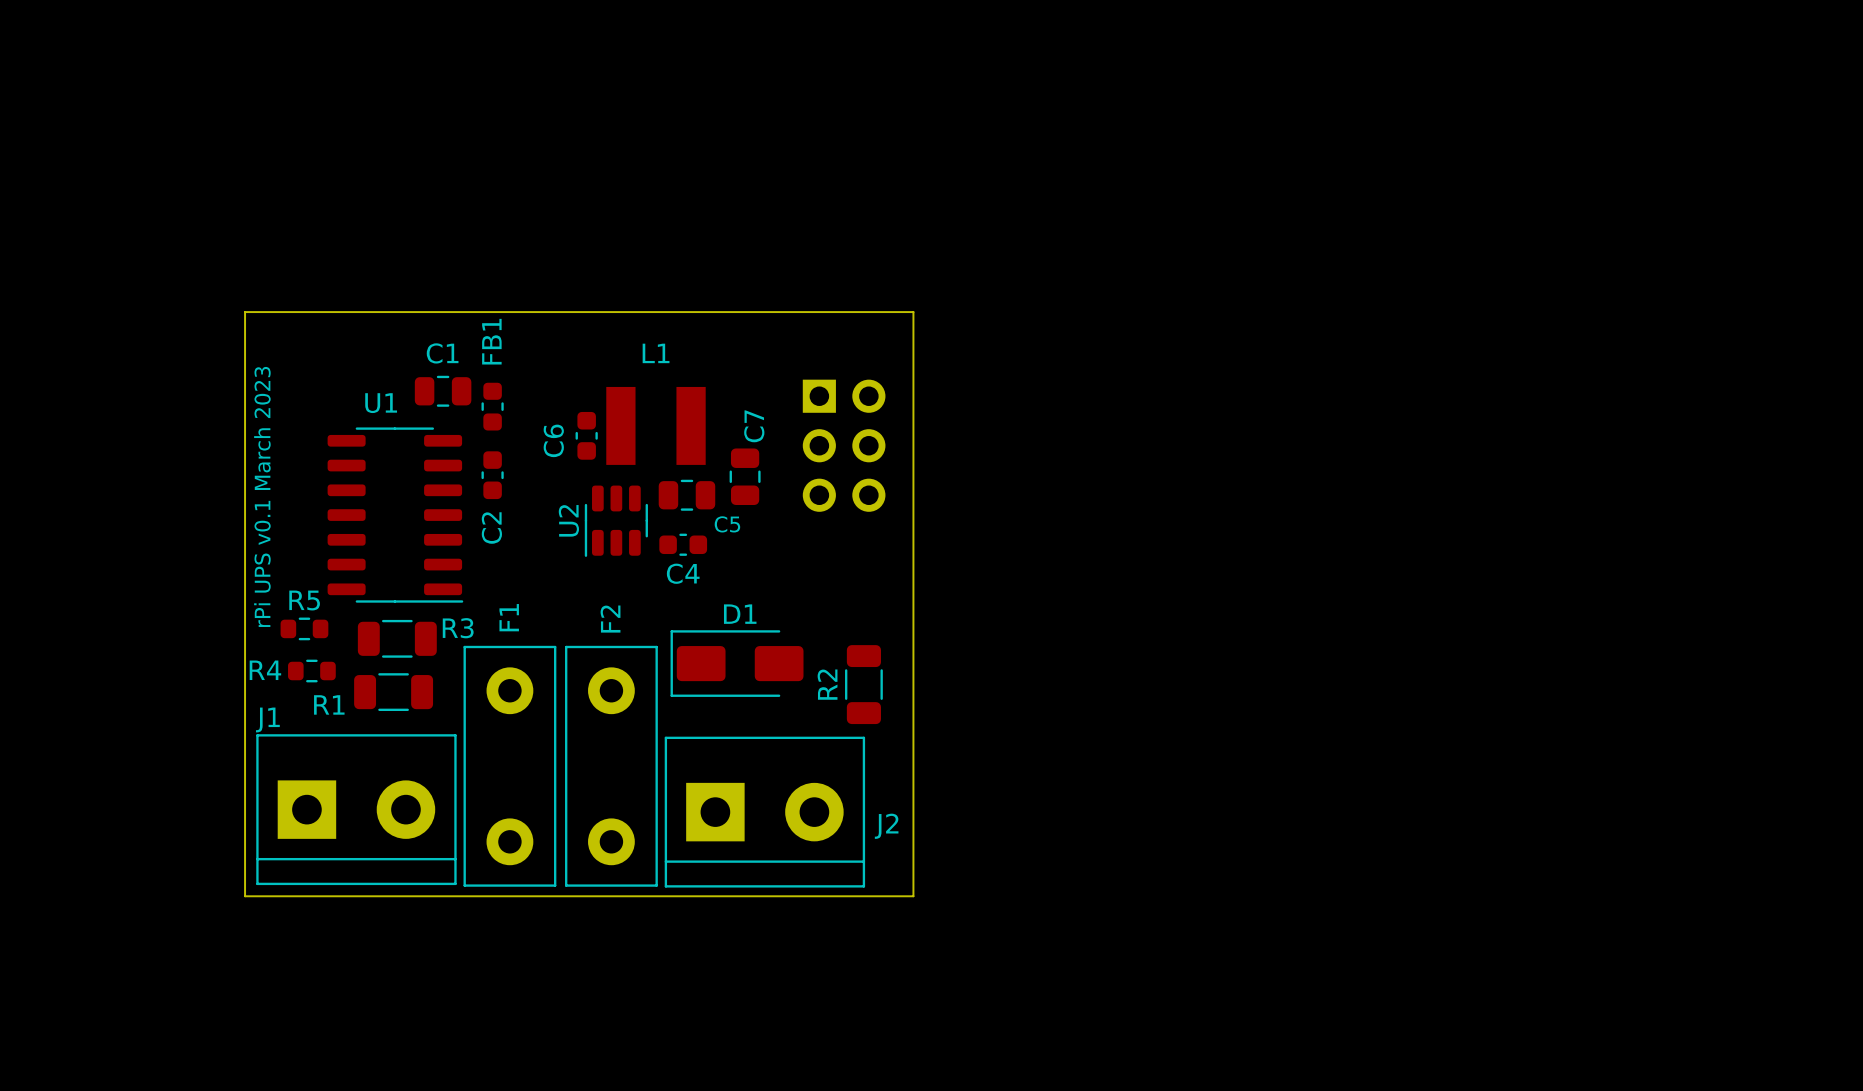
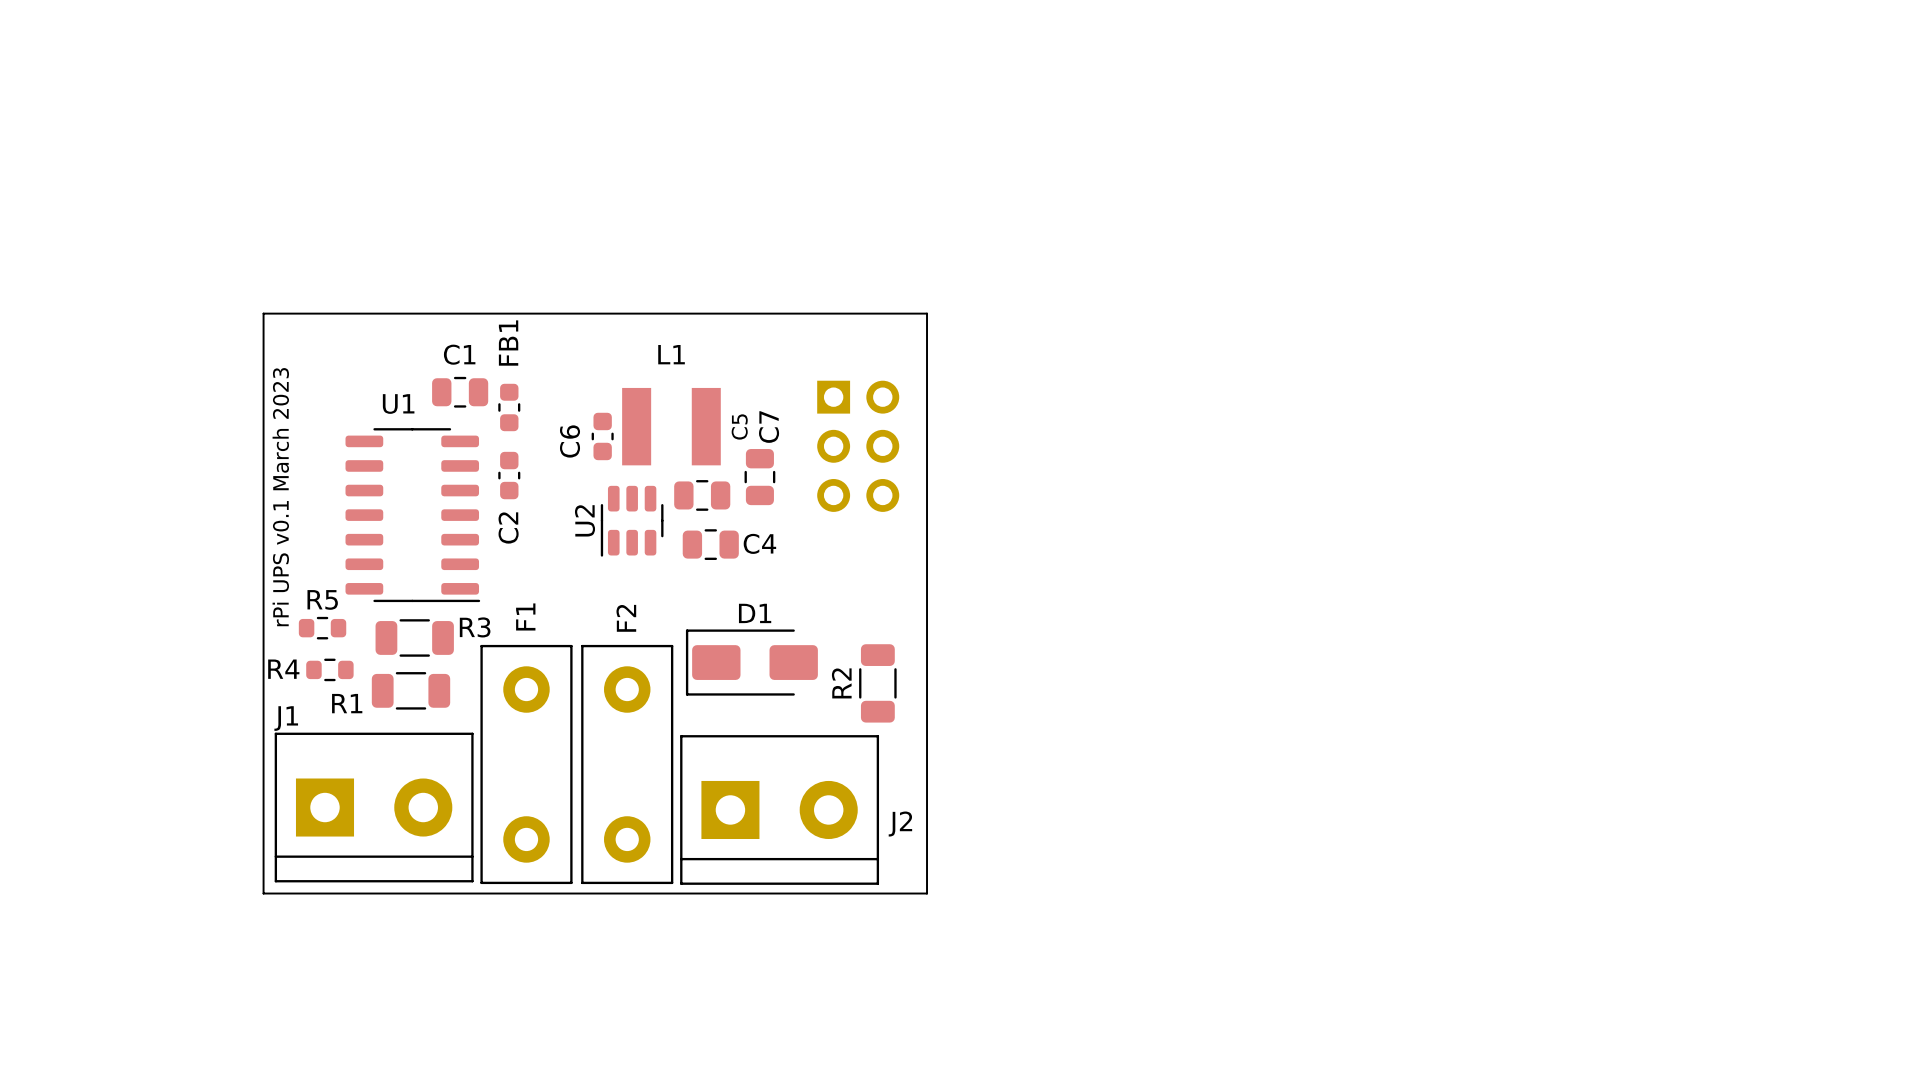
C5 name rotation: 0° (727, 524) -> 90° counterclockwise (739, 426)
C5 name position: C5 (727, 524) -> C5 (739, 426)
C4 footprint: [659, 533, 708, 556] -> [682, 529, 739, 560]
C4 name position: C4 (683, 573) -> C4 (759, 543)

